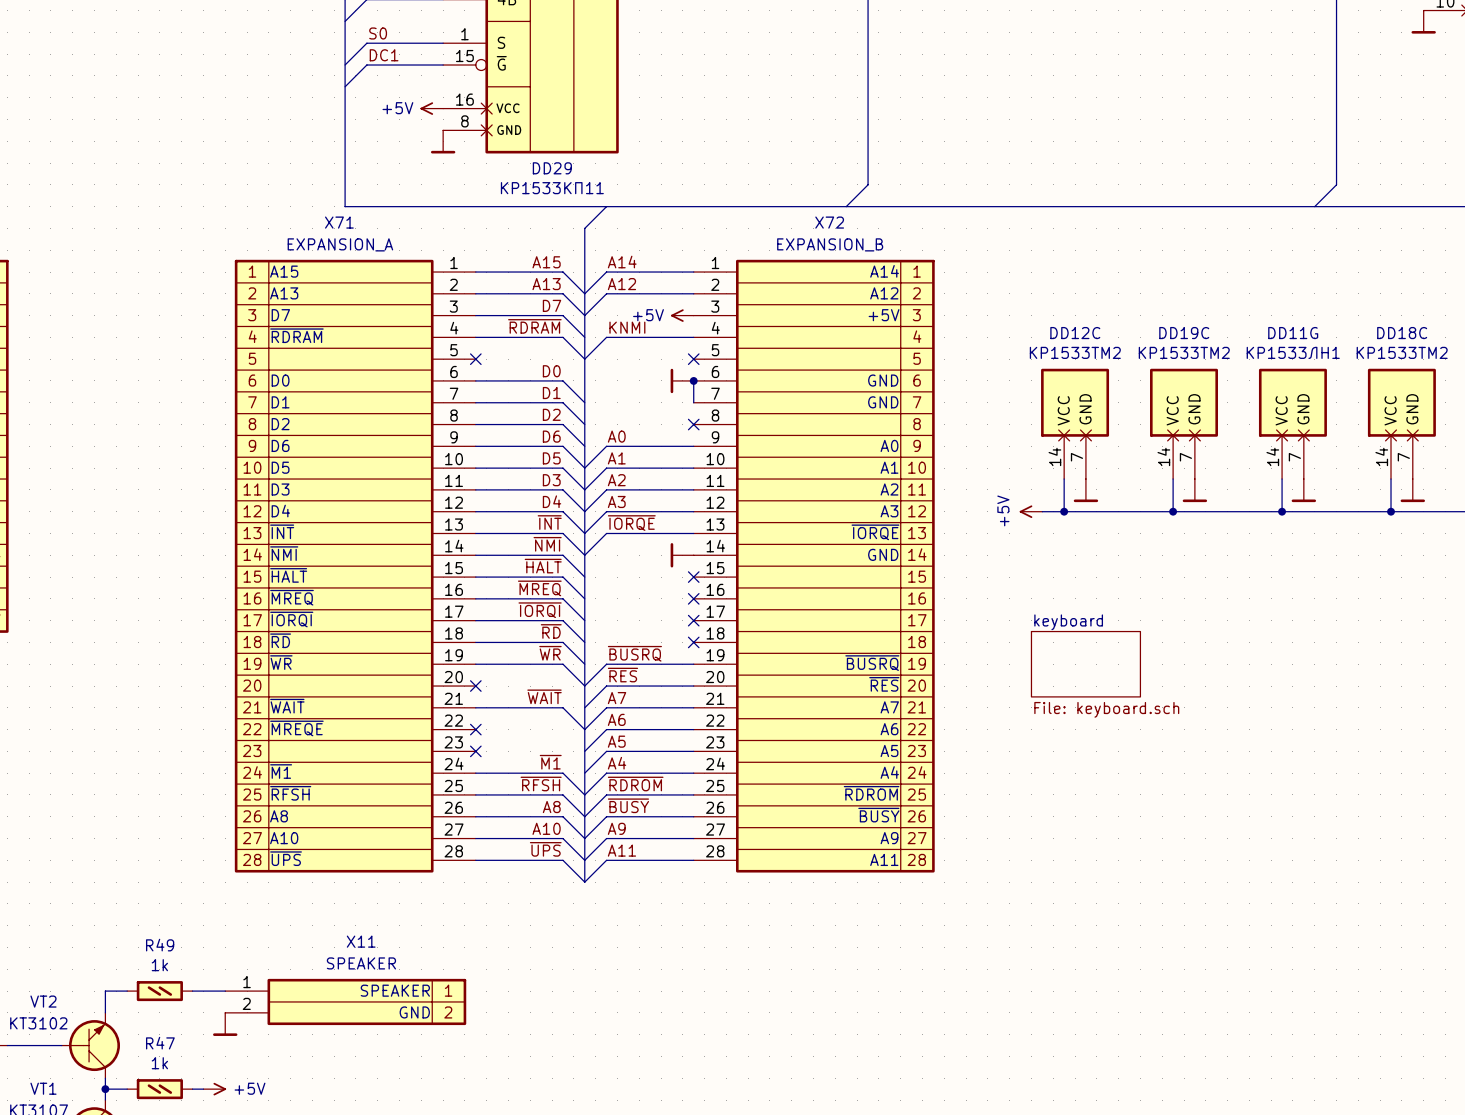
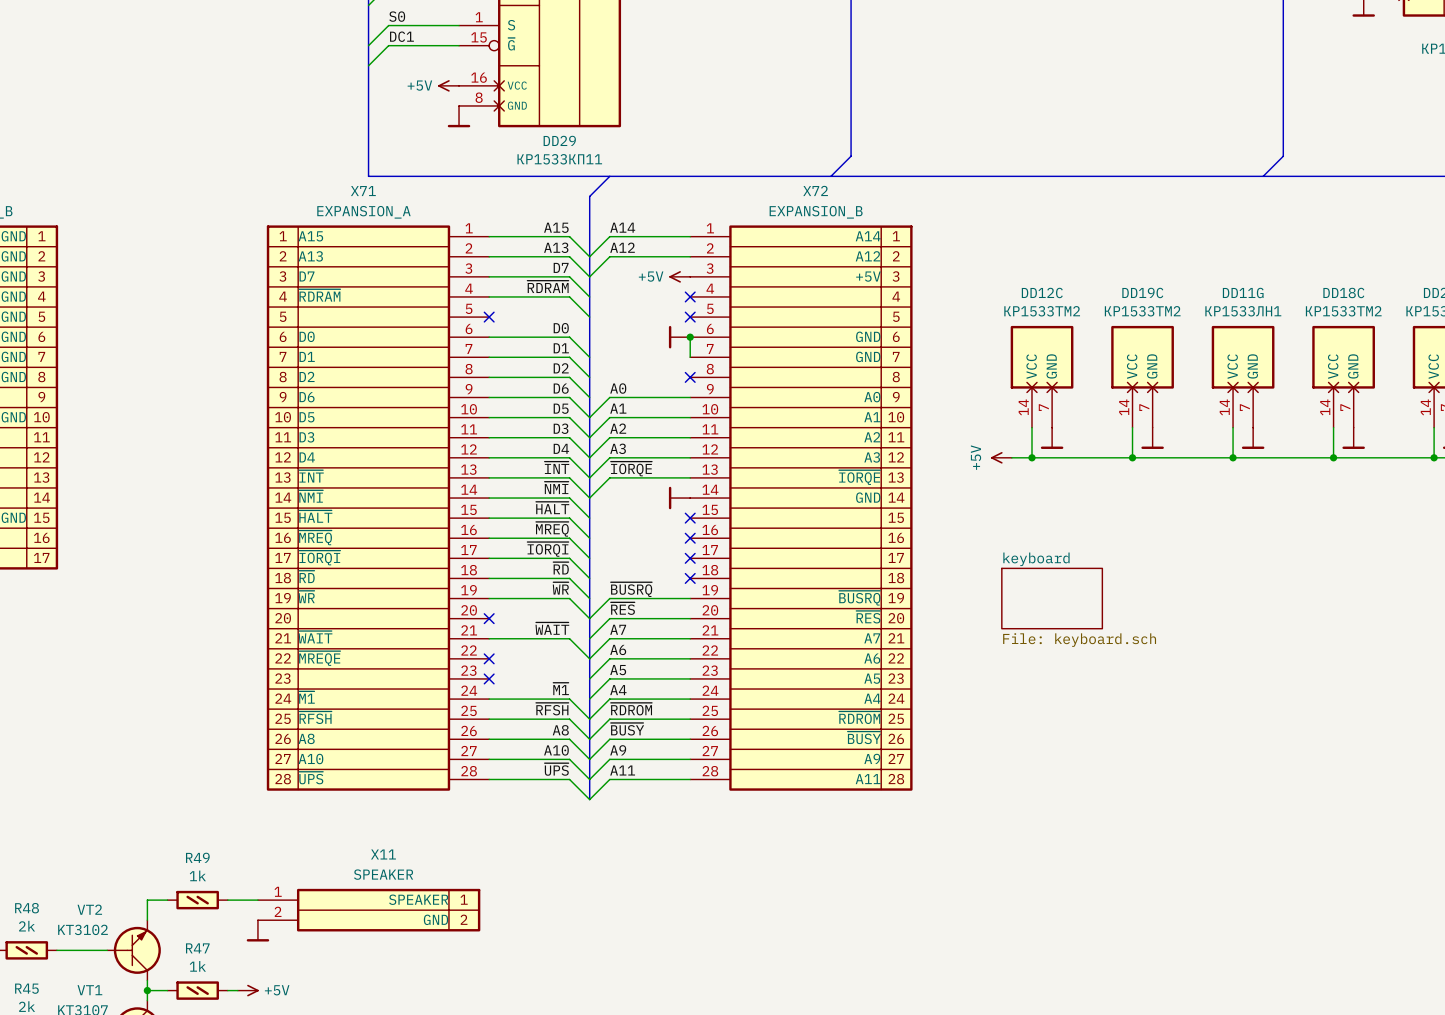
label: KNMI (627, 327) -> none
wire: (693, 337) (606, 337) (584, 359) -> none
no-connect mark: none -> (690, 296)

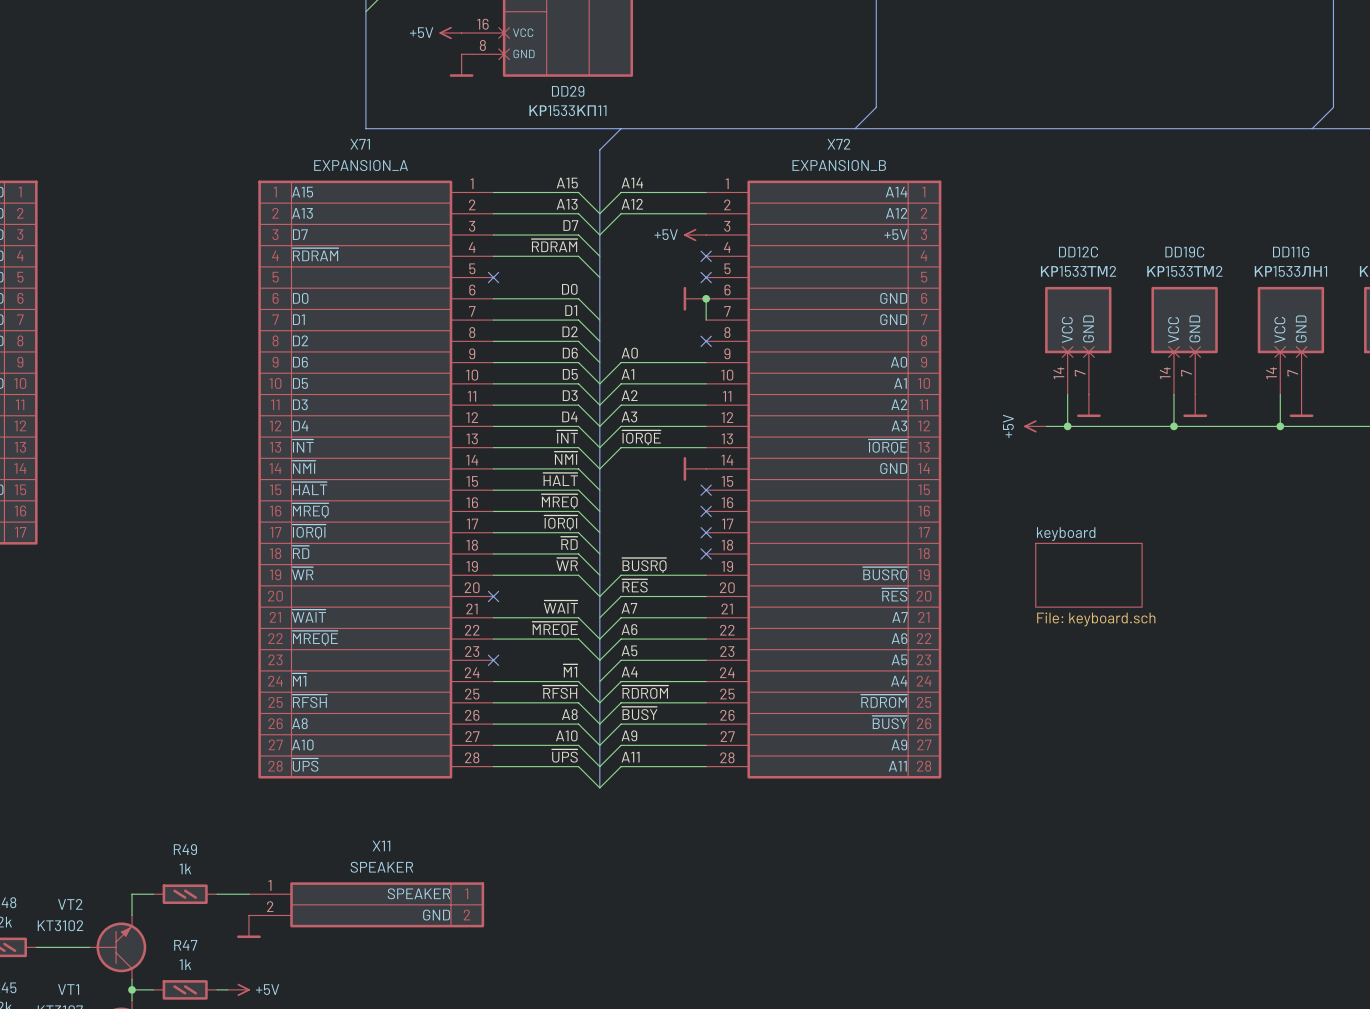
label: none -> ~{MREQE} (555, 629)
wire: none -> (493, 639) (578, 639) (599, 660)
no-connect mark: (489, 658) -> none

